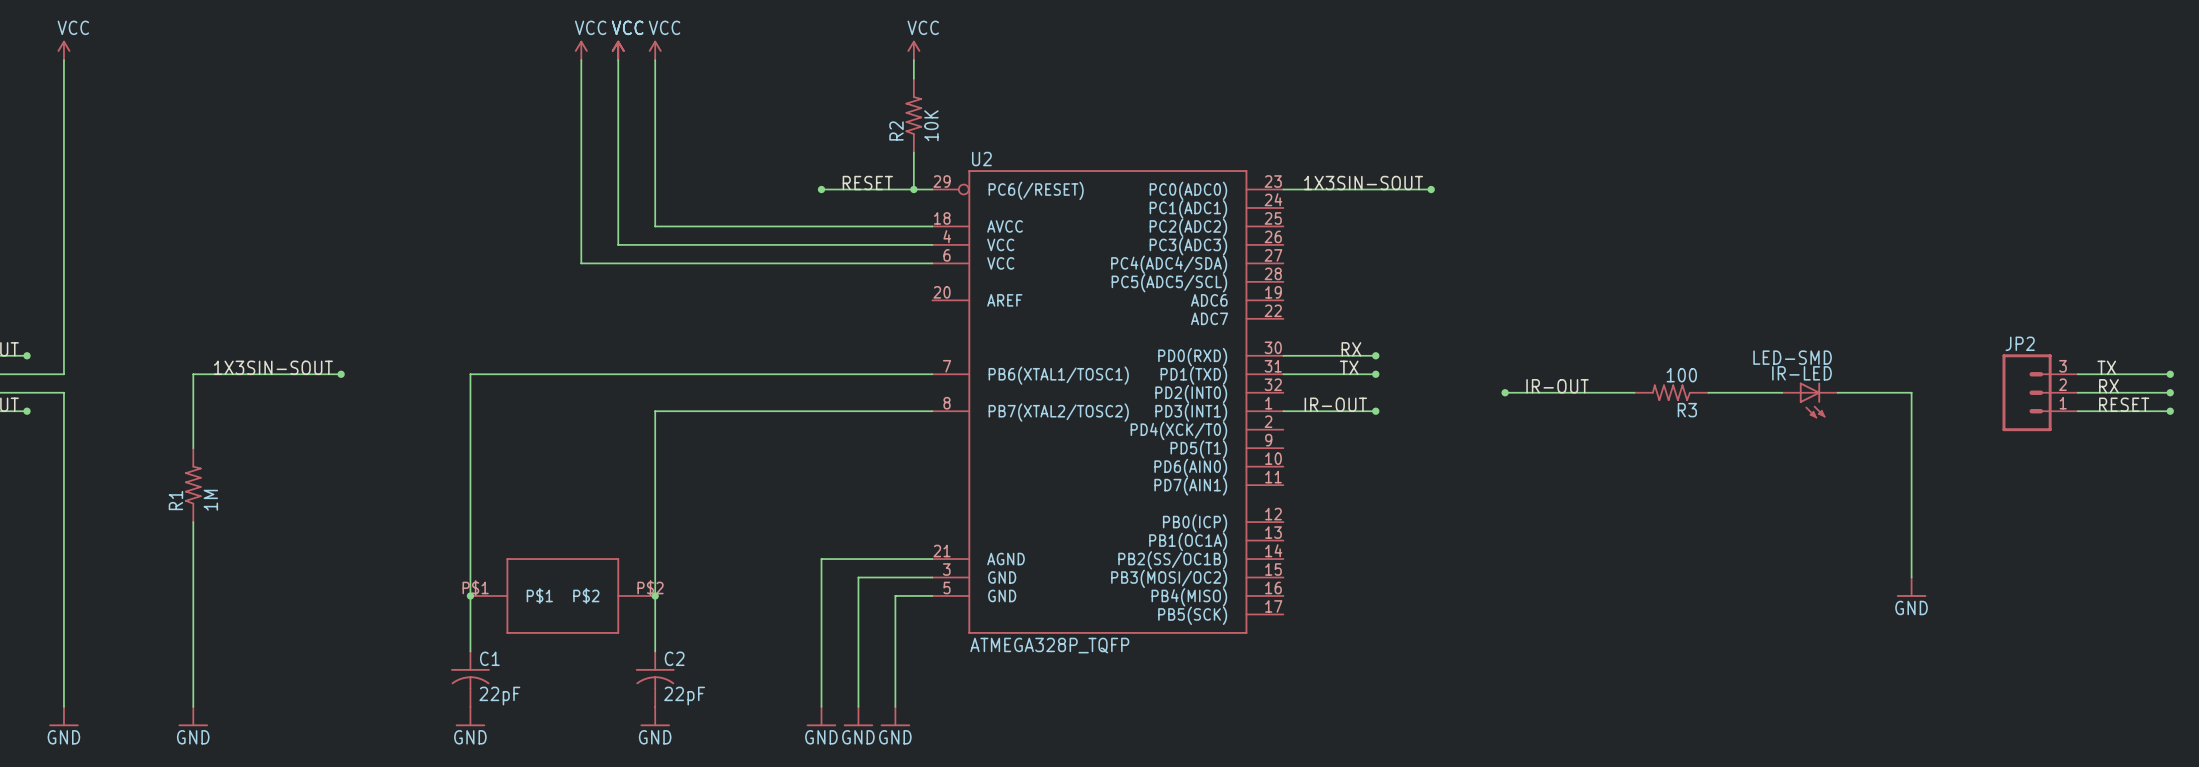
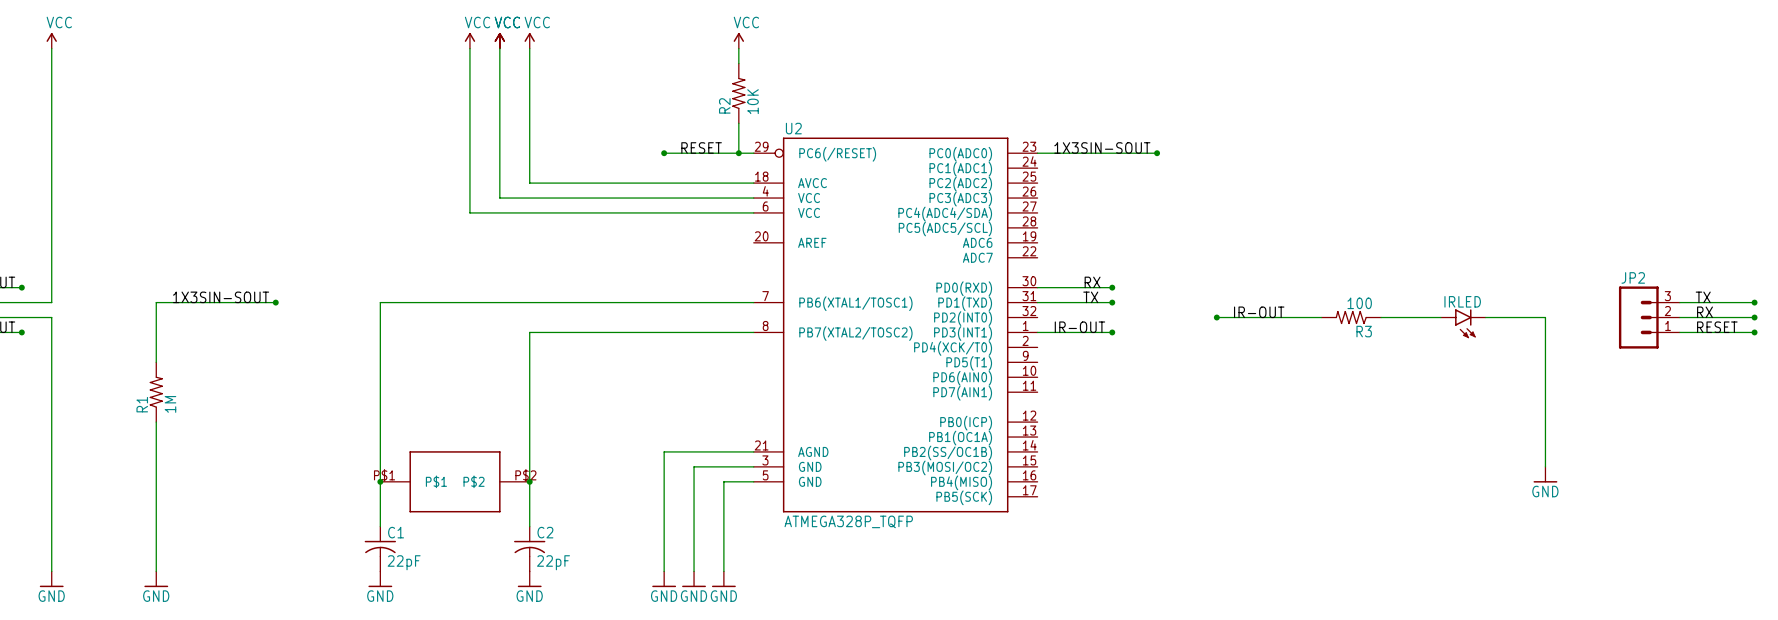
IR-LED: LED-SMD (1809, 400) -> none
IRLED: none -> (1463, 323)

